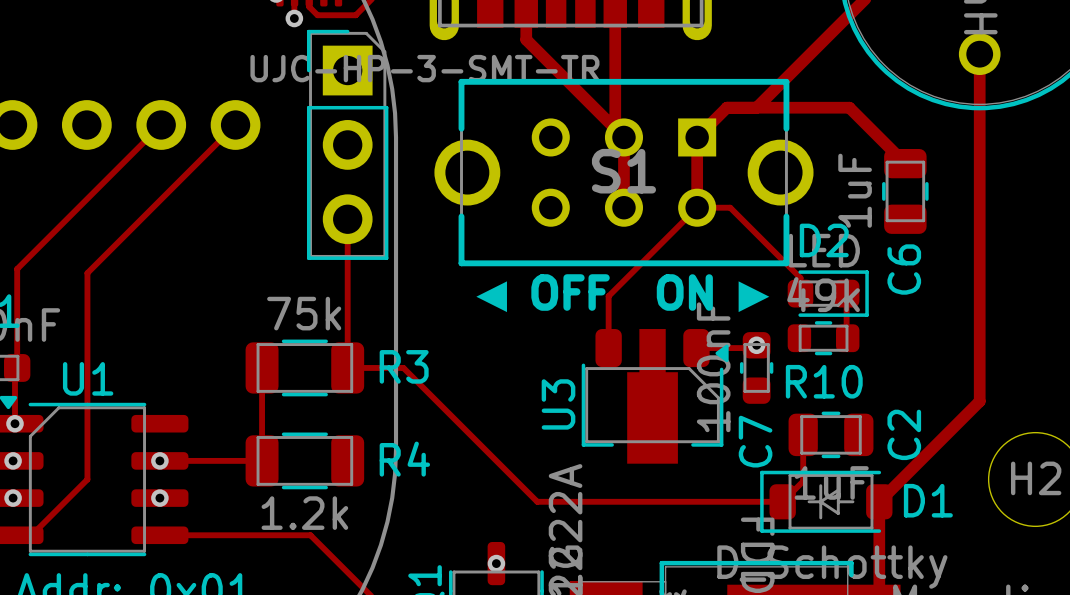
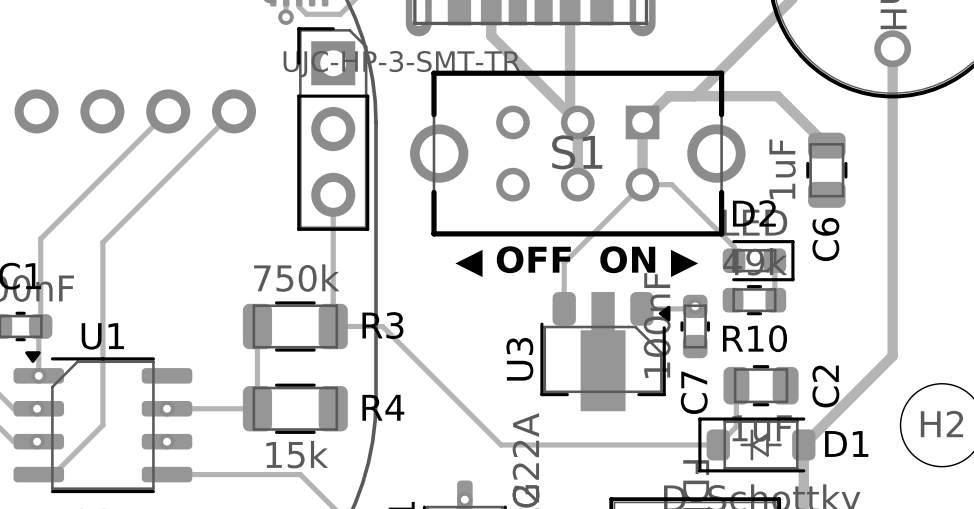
R3 value: 75k (304, 313) -> 750k (296, 278)
R4 value: 1.2k (304, 513) -> 15k (297, 454)

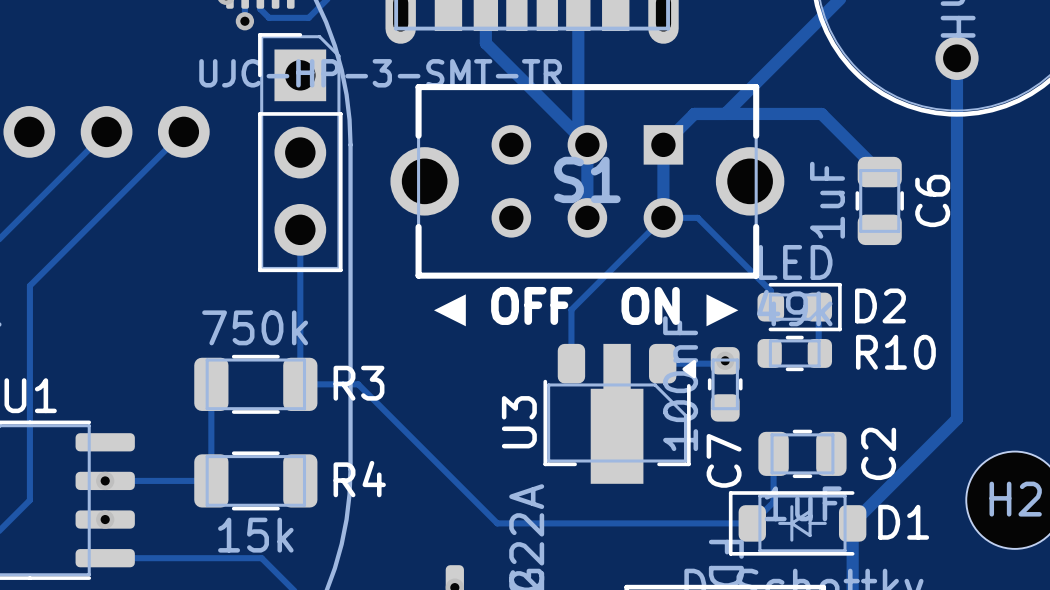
D2 name position: D2 (754, 213) -> D2 (880, 305)
C6 name position: C6 (825, 239) -> C6 (932, 200)
R10 name position: R10 (755, 338) -> R10 (895, 352)

